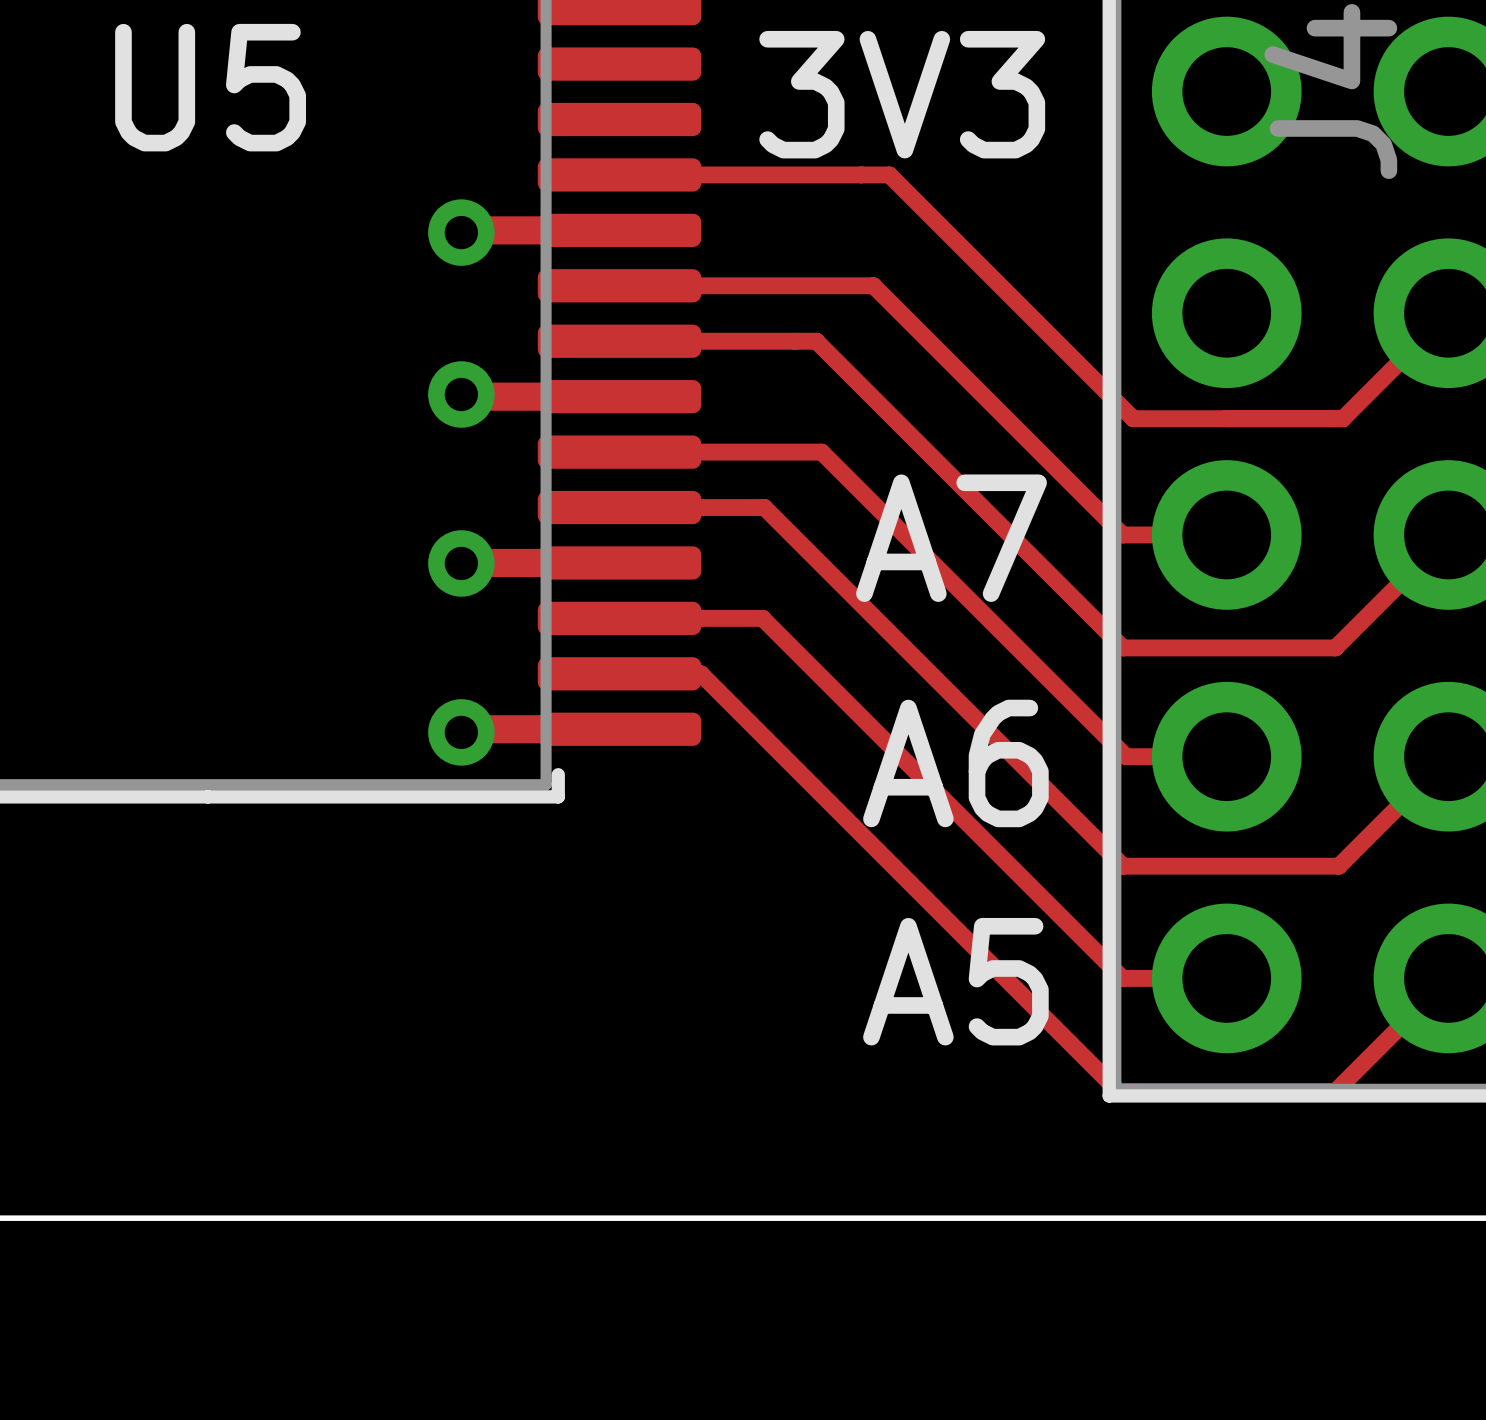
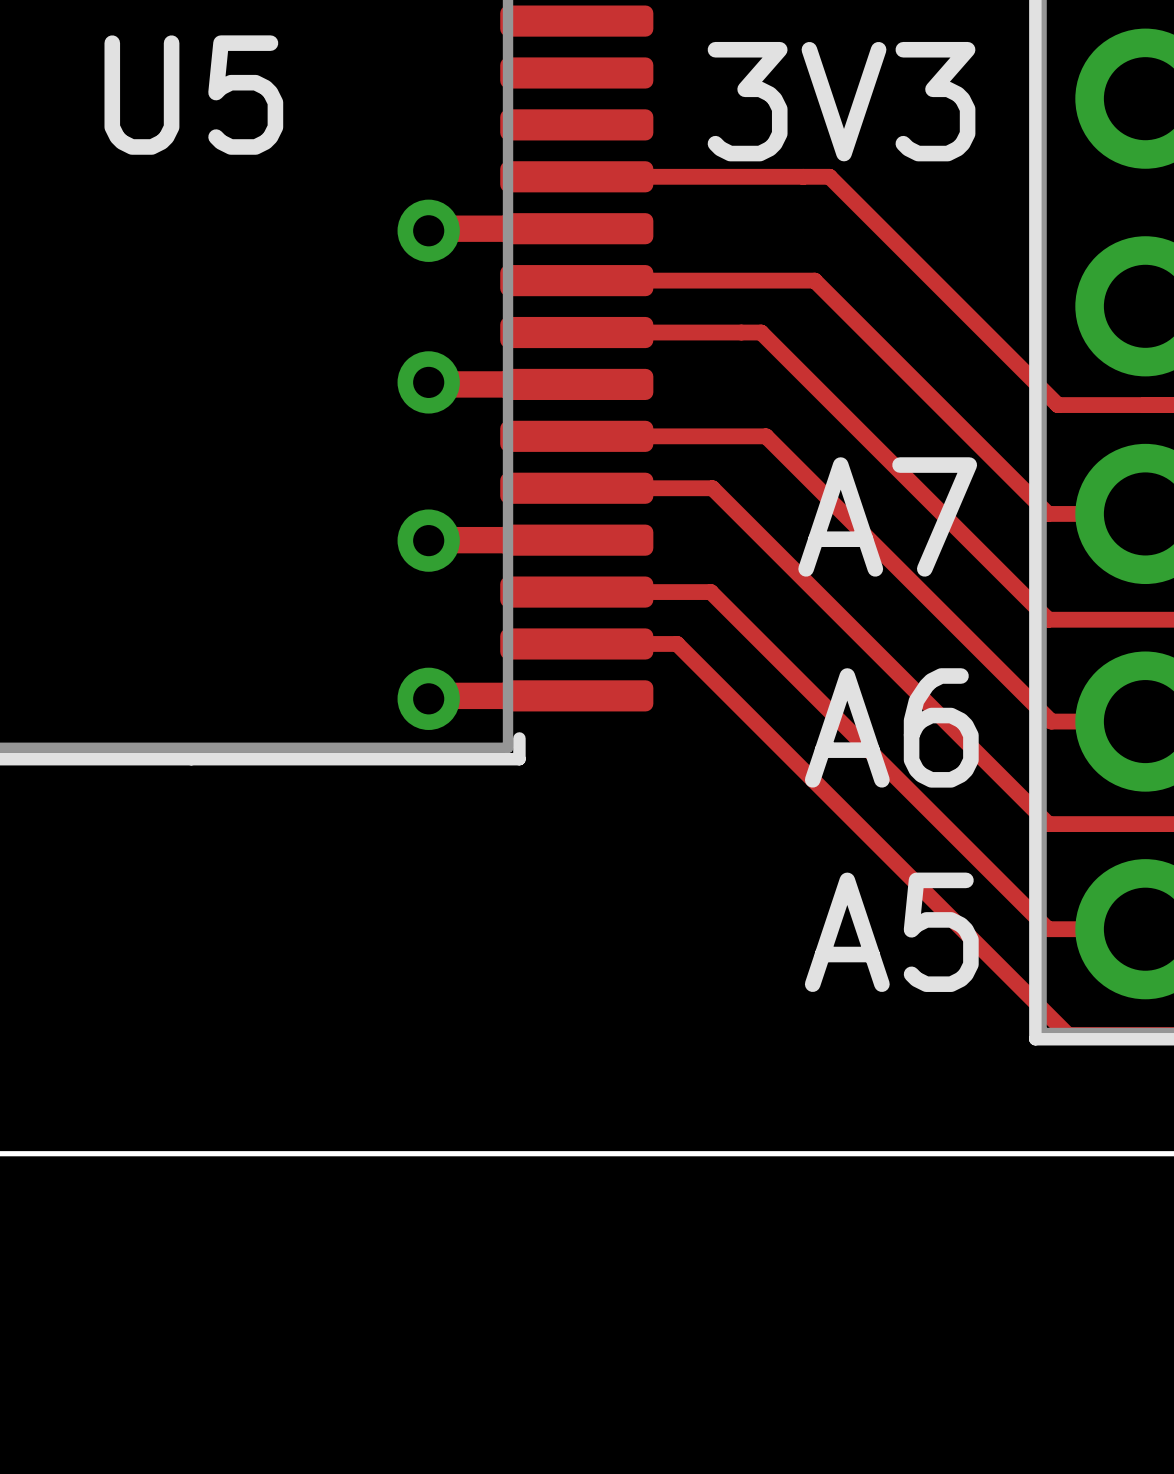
track: (700, 673) (1118, 1091) (1144, 1091) -> (653, 643) (677, 643) (1068, 1035)

